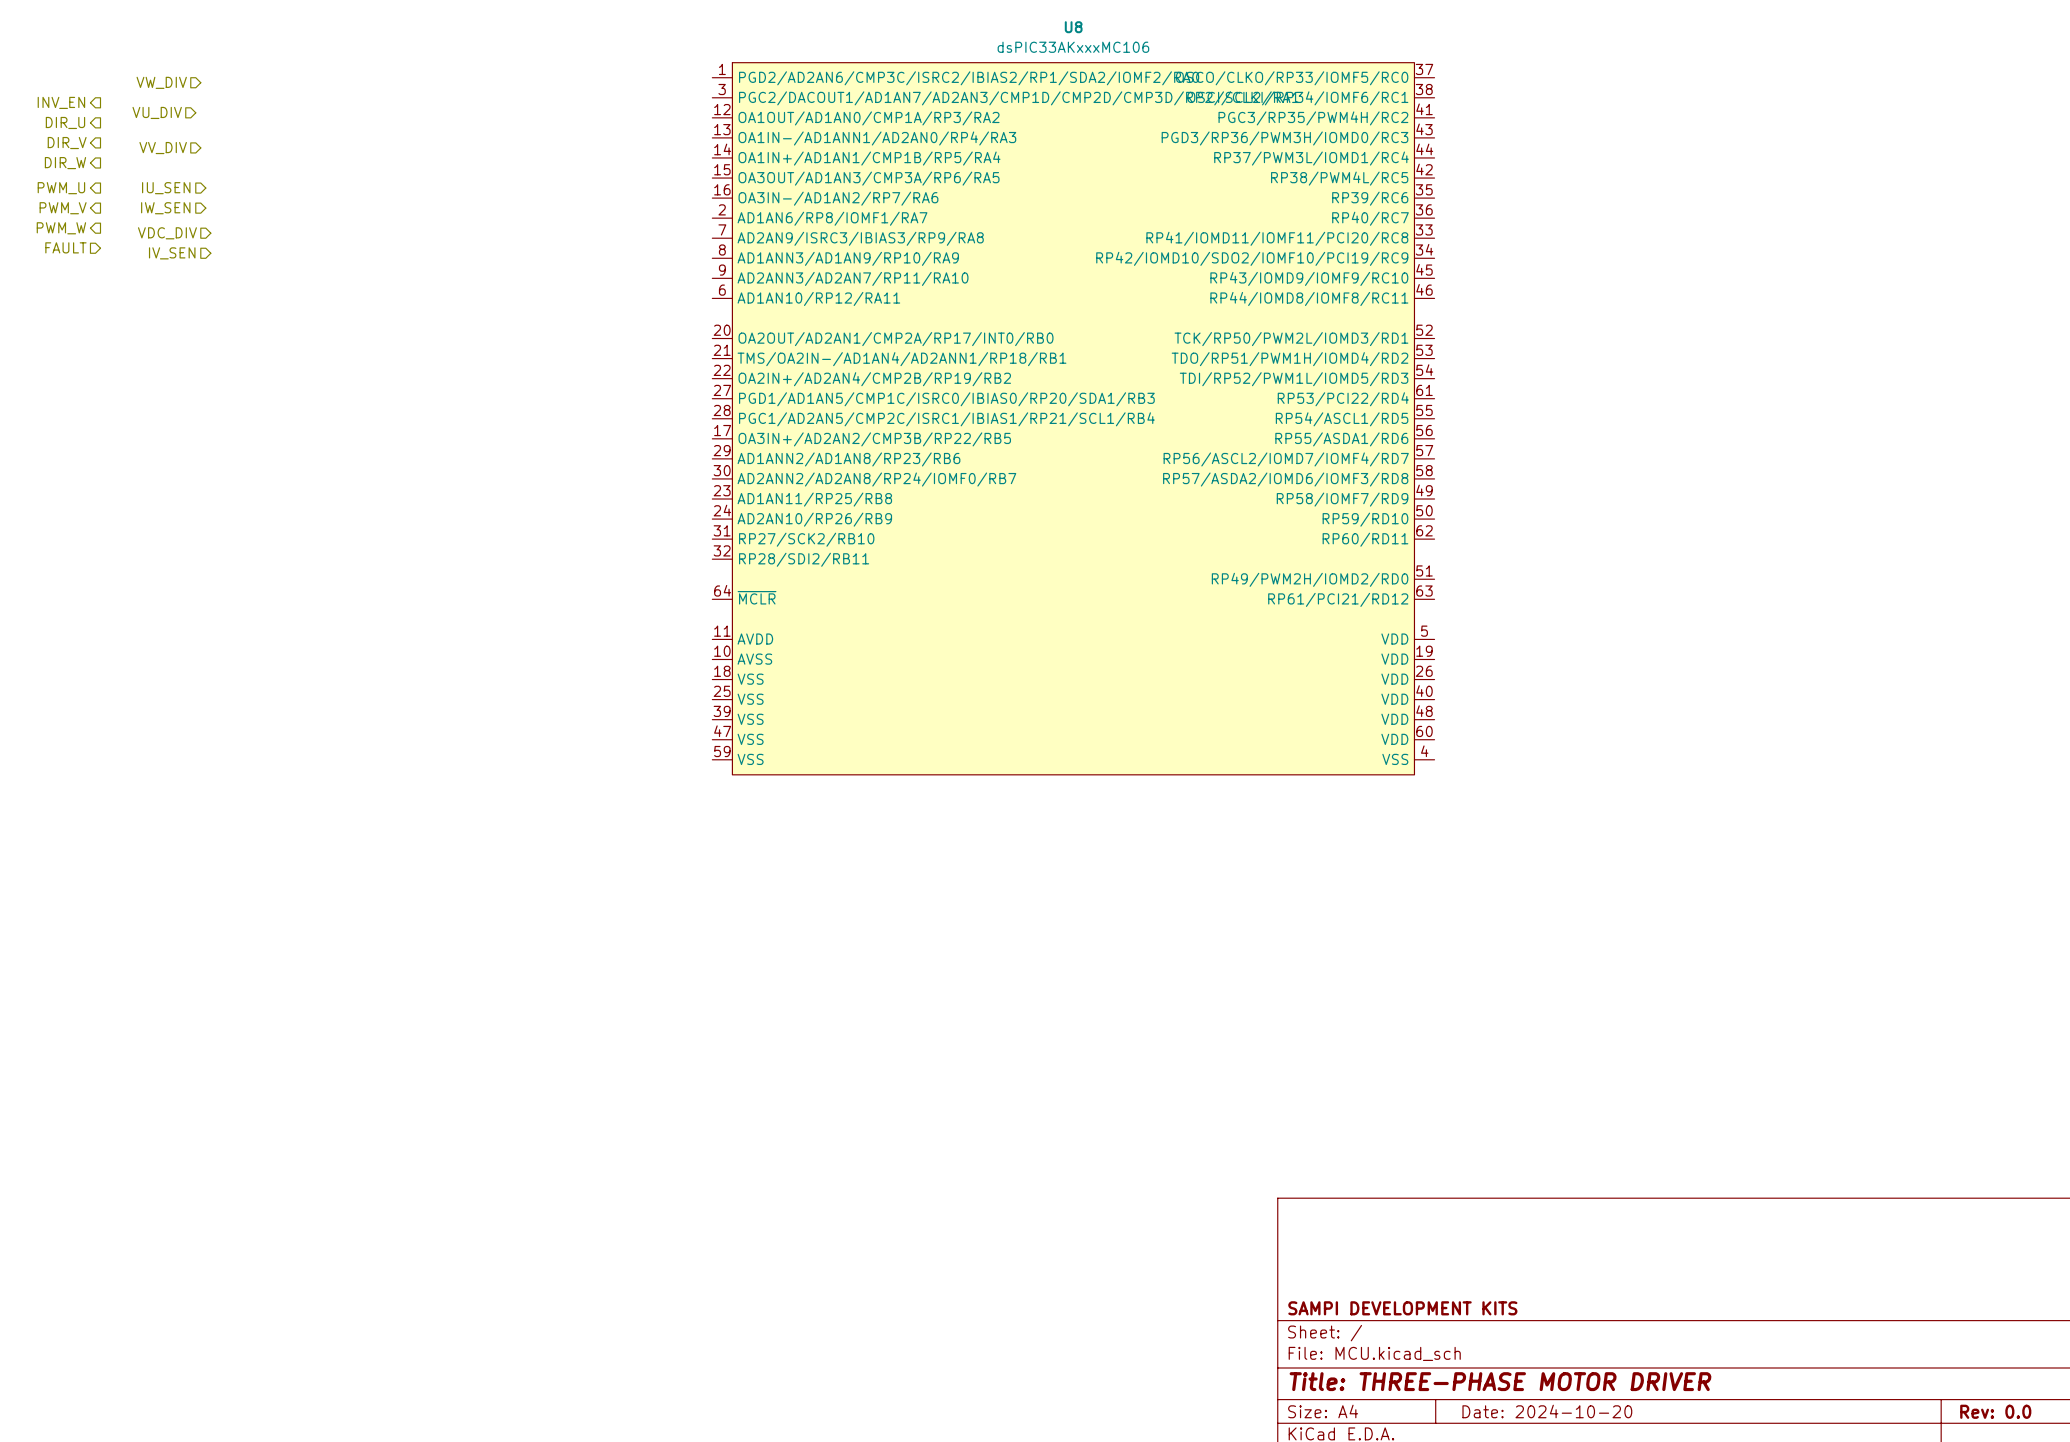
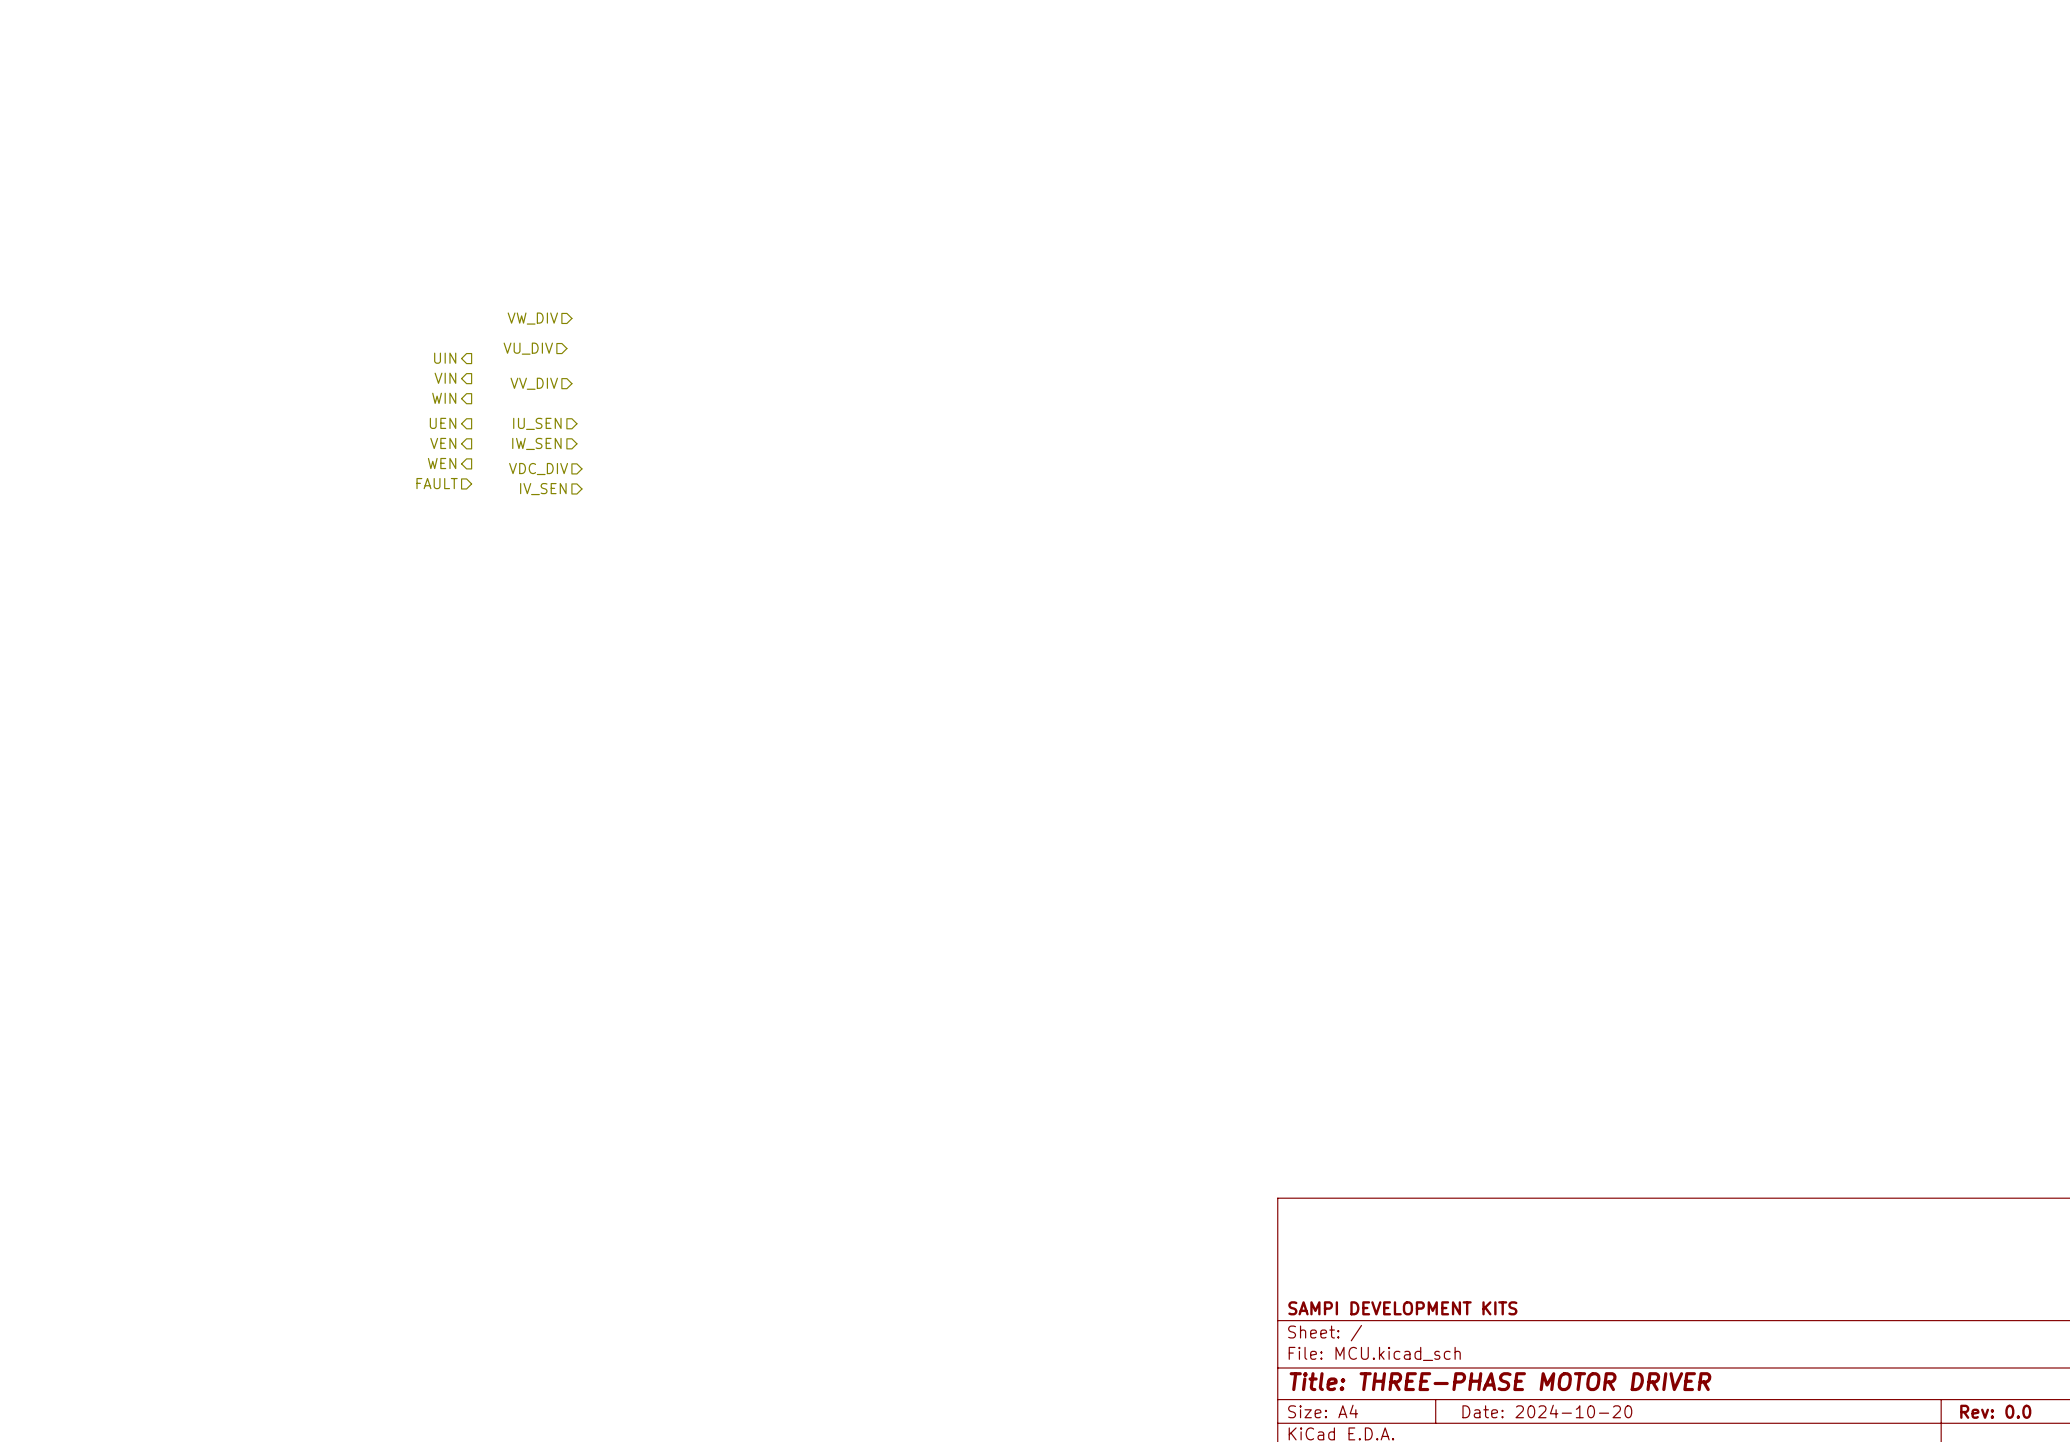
hierarchical label: VW_DIV (161, 82) -> none
hierarchical label: INV_EN (61, 102) -> none
hierarchical label: VU_DIV (157, 112) -> none
hierarchical label: DIR_U (65, 122) -> none
hierarchical label: DIR_V (67, 143) -> none
hierarchical label: VV_DIV (163, 148) -> none
hierarchical label: DIR_W (65, 163) -> none
hierarchical label: PWM_U (61, 188) -> none
hierarchical label: IU_SEN (166, 188) -> none
hierarchical label: PWM_V (63, 208) -> none
hierarchical label: IW_SEN (165, 208) -> none
hierarchical label: PWM_W (61, 228) -> none
hierarchical label: VDC_DIV (167, 233) -> none
hierarchical label: FAULT (65, 247) -> none
hierarchical label: IV_SEN (172, 253) -> none
hierarchical label: none -> VW_DIV (532, 318)
hierarchical label: none -> VU_DIV (528, 348)
hierarchical label: none -> UIN (445, 358)
hierarchical label: none -> VIN (445, 378)
hierarchical label: none -> VV_DIV (534, 383)
hierarchical label: none -> WIN (444, 398)
U8: dsPIC33AKxxxMC106 (1073, 418) -> none
hierarchical label: none -> UEN (443, 423)
hierarchical label: none -> IU_SEN (537, 423)
hierarchical label: none -> VEN (443, 443)
hierarchical label: none -> IW_SEN (536, 443)
hierarchical label: none -> WEN (442, 463)
hierarchical label: none -> VDC_DIV (538, 469)
hierarchical label: none -> FAULT (437, 483)
hierarchical label: none -> IV_SEN (543, 489)

